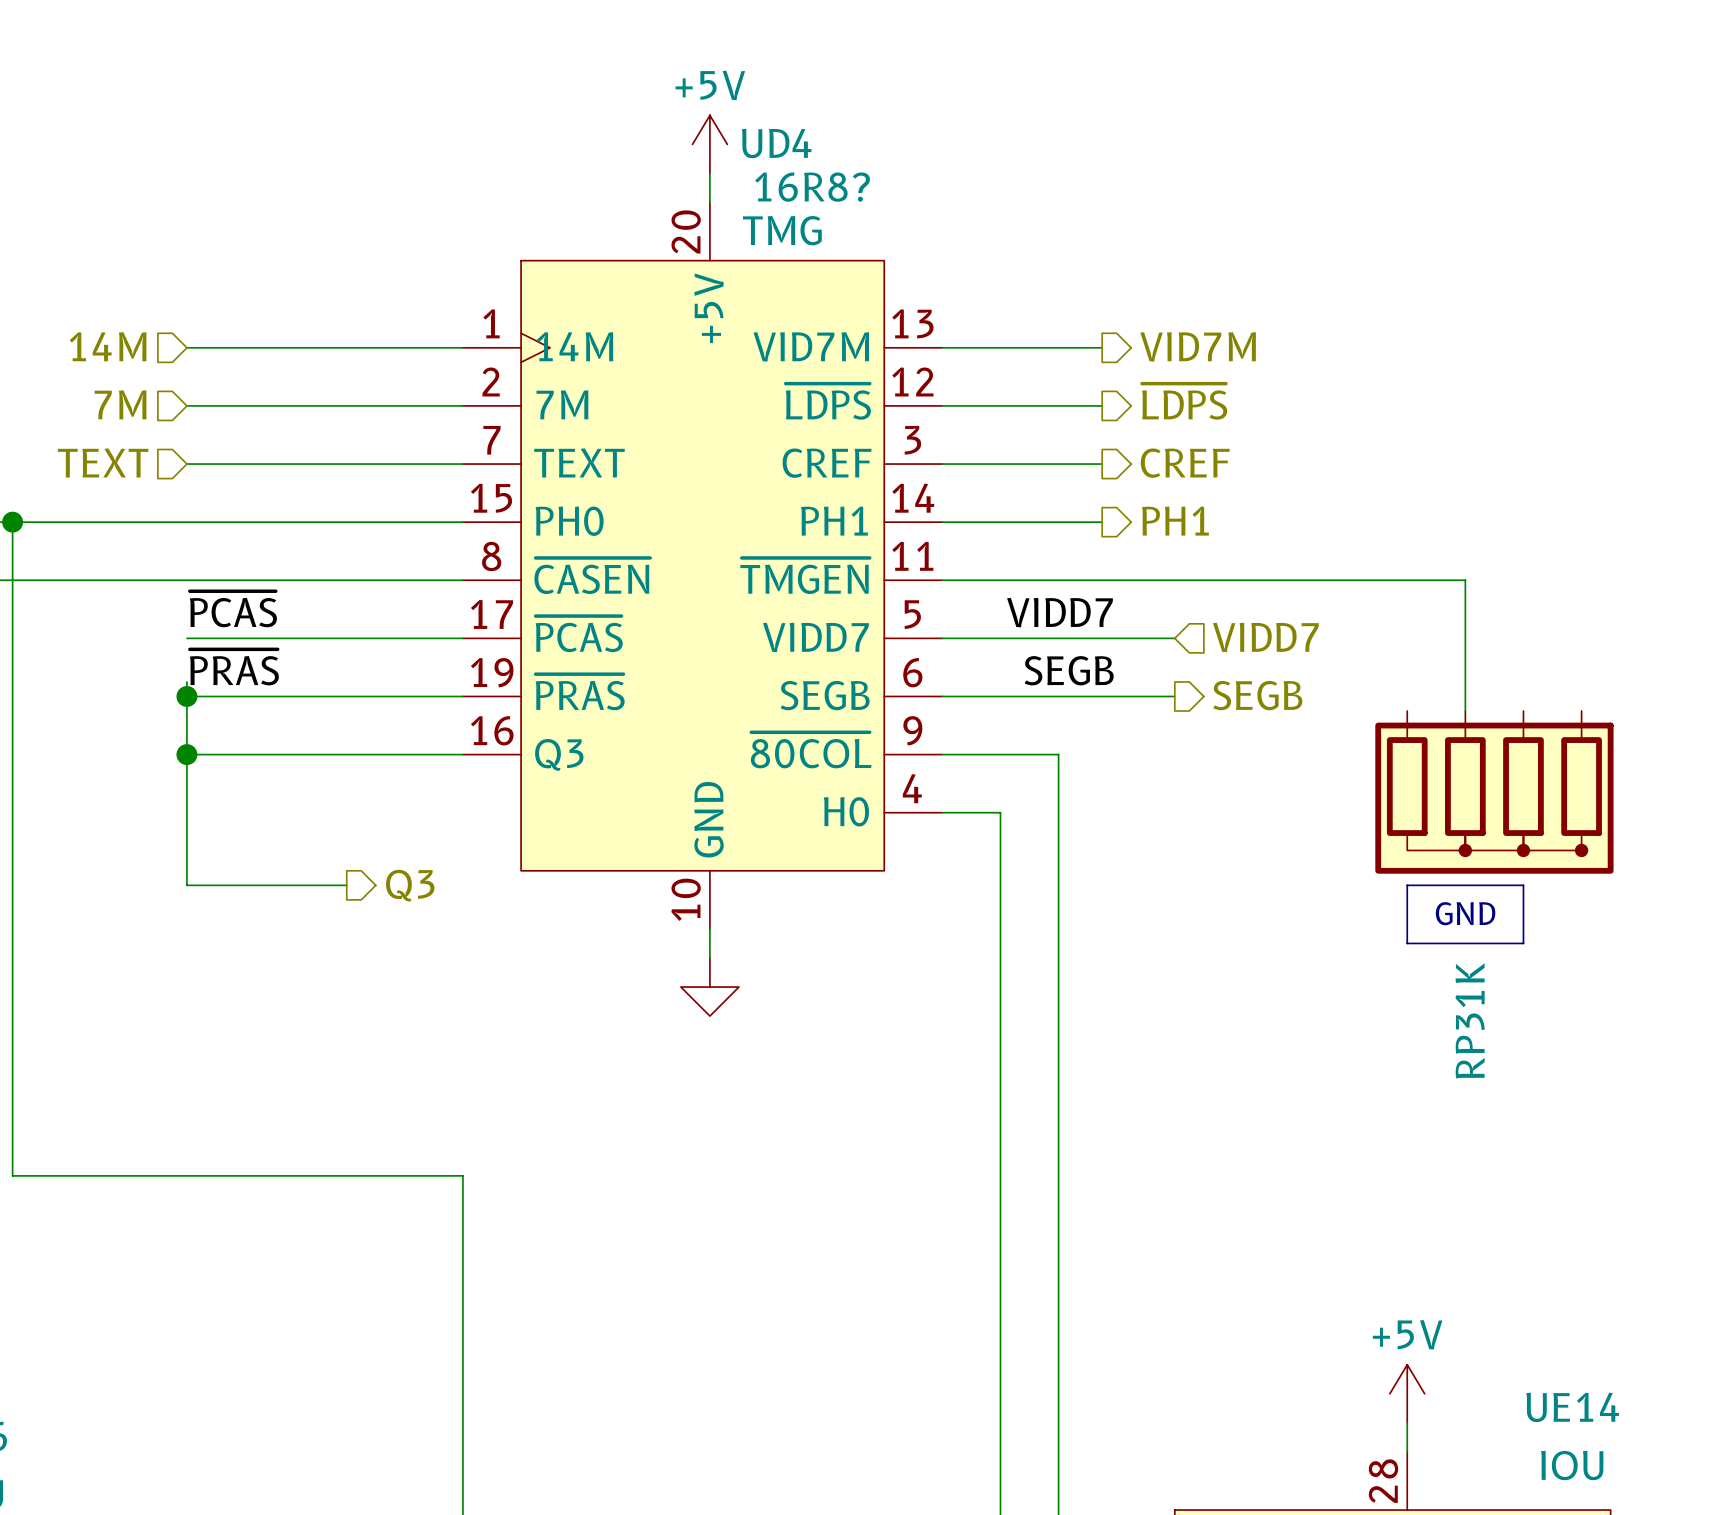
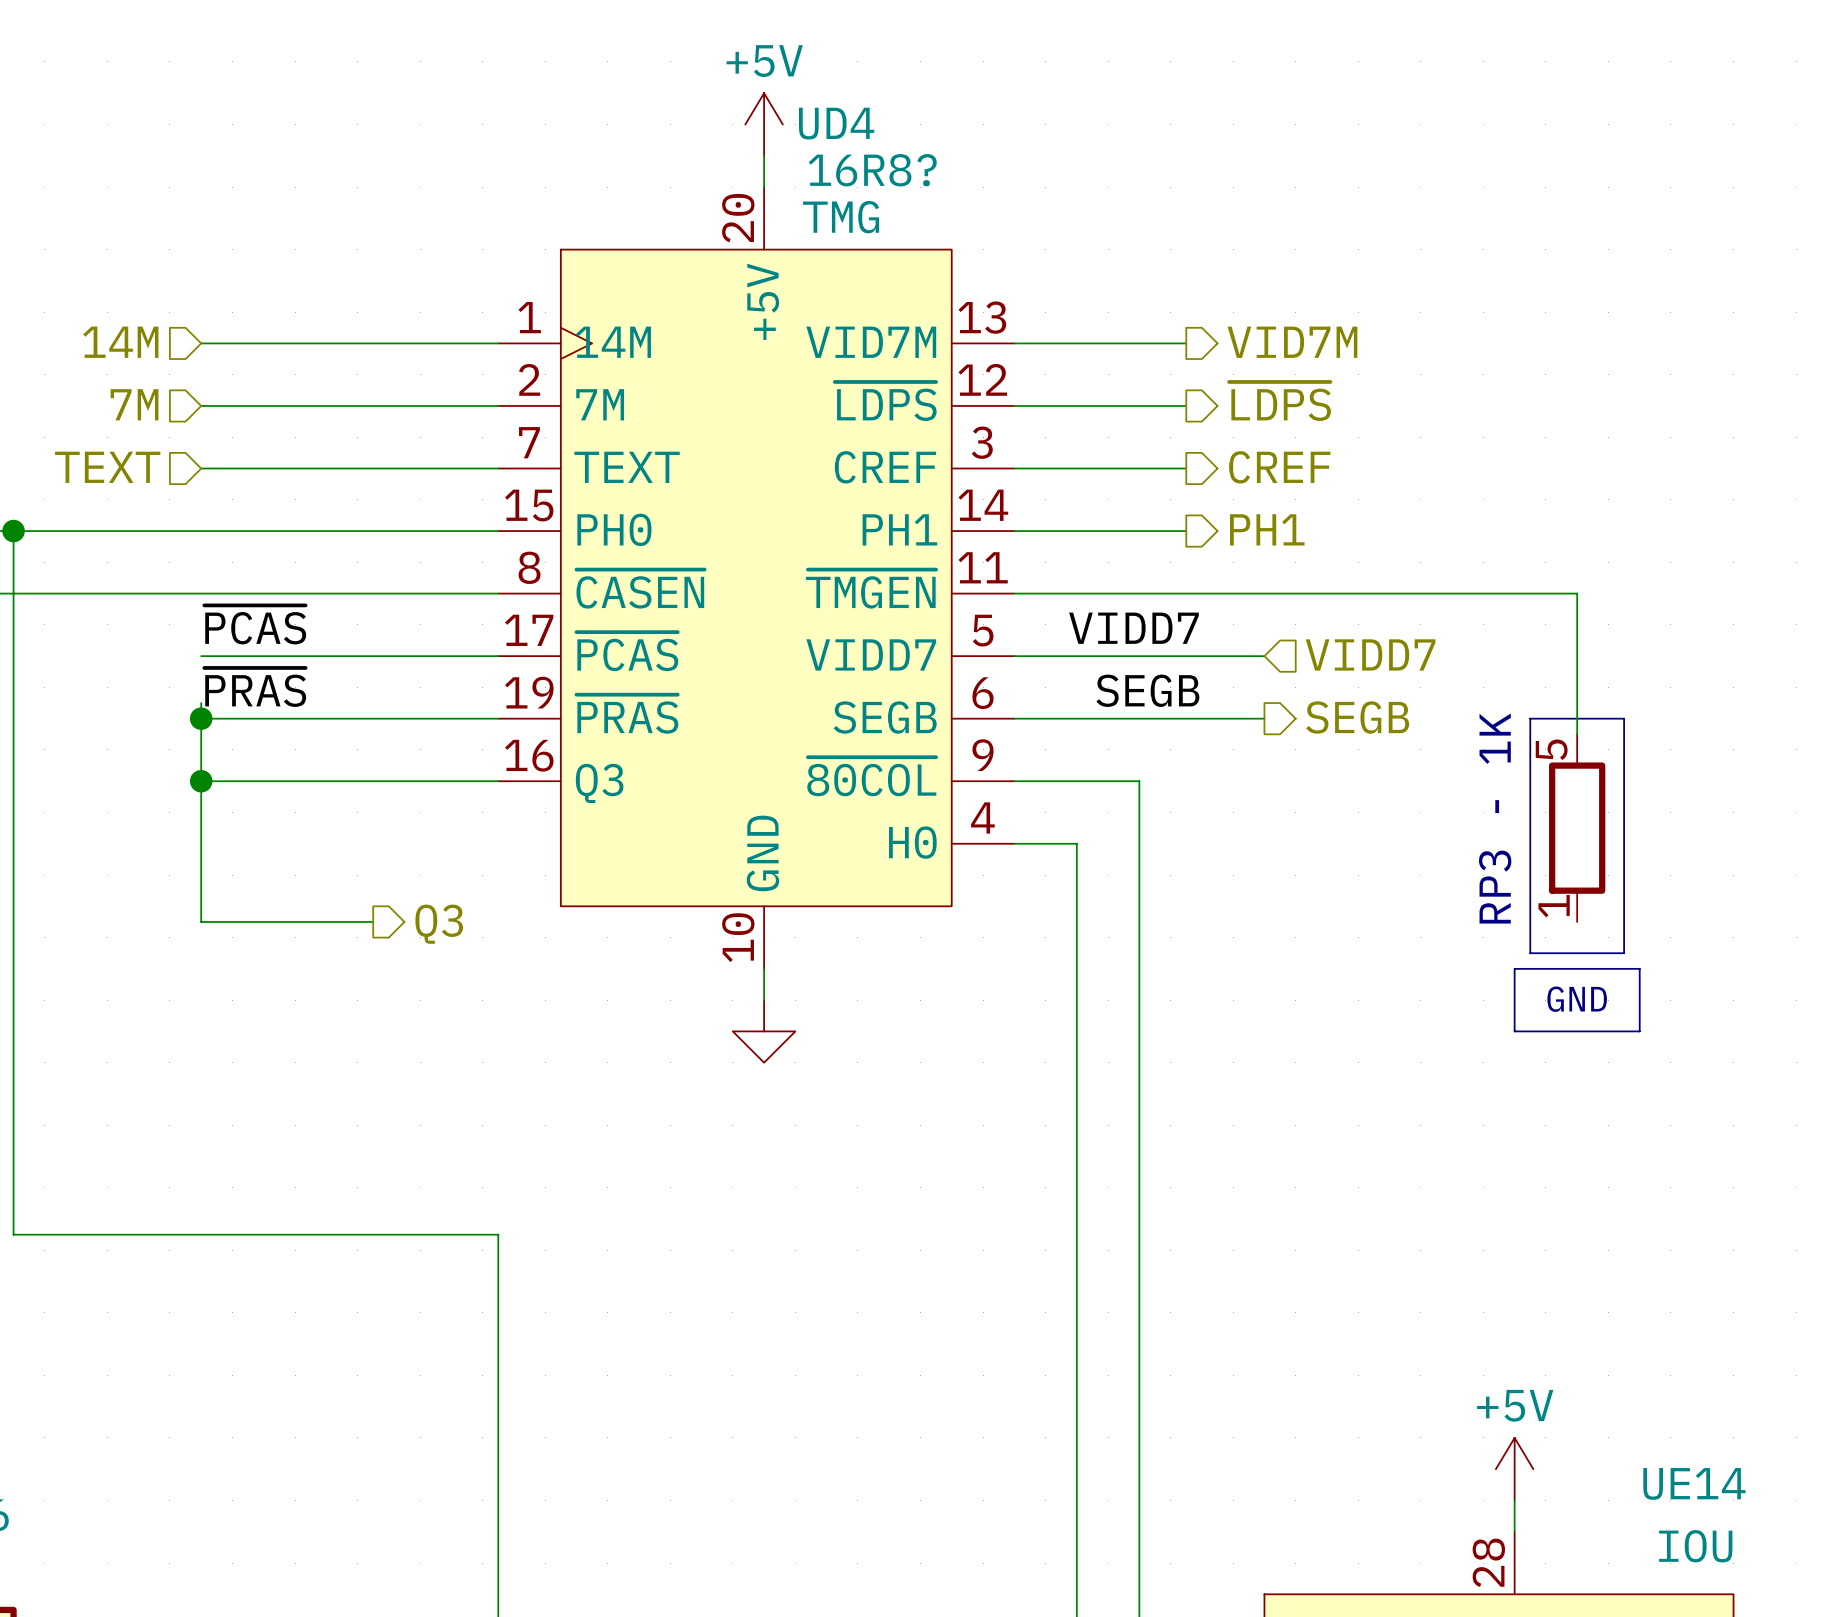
line: none -> (1530, 718) (1624, 718) (1624, 953) (1530, 953) (1530, 718)
text: none -> RP3 - 1K (1495, 818)
RP3: 1K (1494, 792) -> none
part: none -> (1577, 828)
text position: GND (1465, 913) -> GND (1577, 999)
line: (1407, 928) (1407, 885) (1523, 885) (1523, 928) -> (1514, 968) (1639, 968)
line: (1407, 943) (1523, 943) -> (1514, 984) (1514, 1031) (1639, 1031) (1639, 984)

